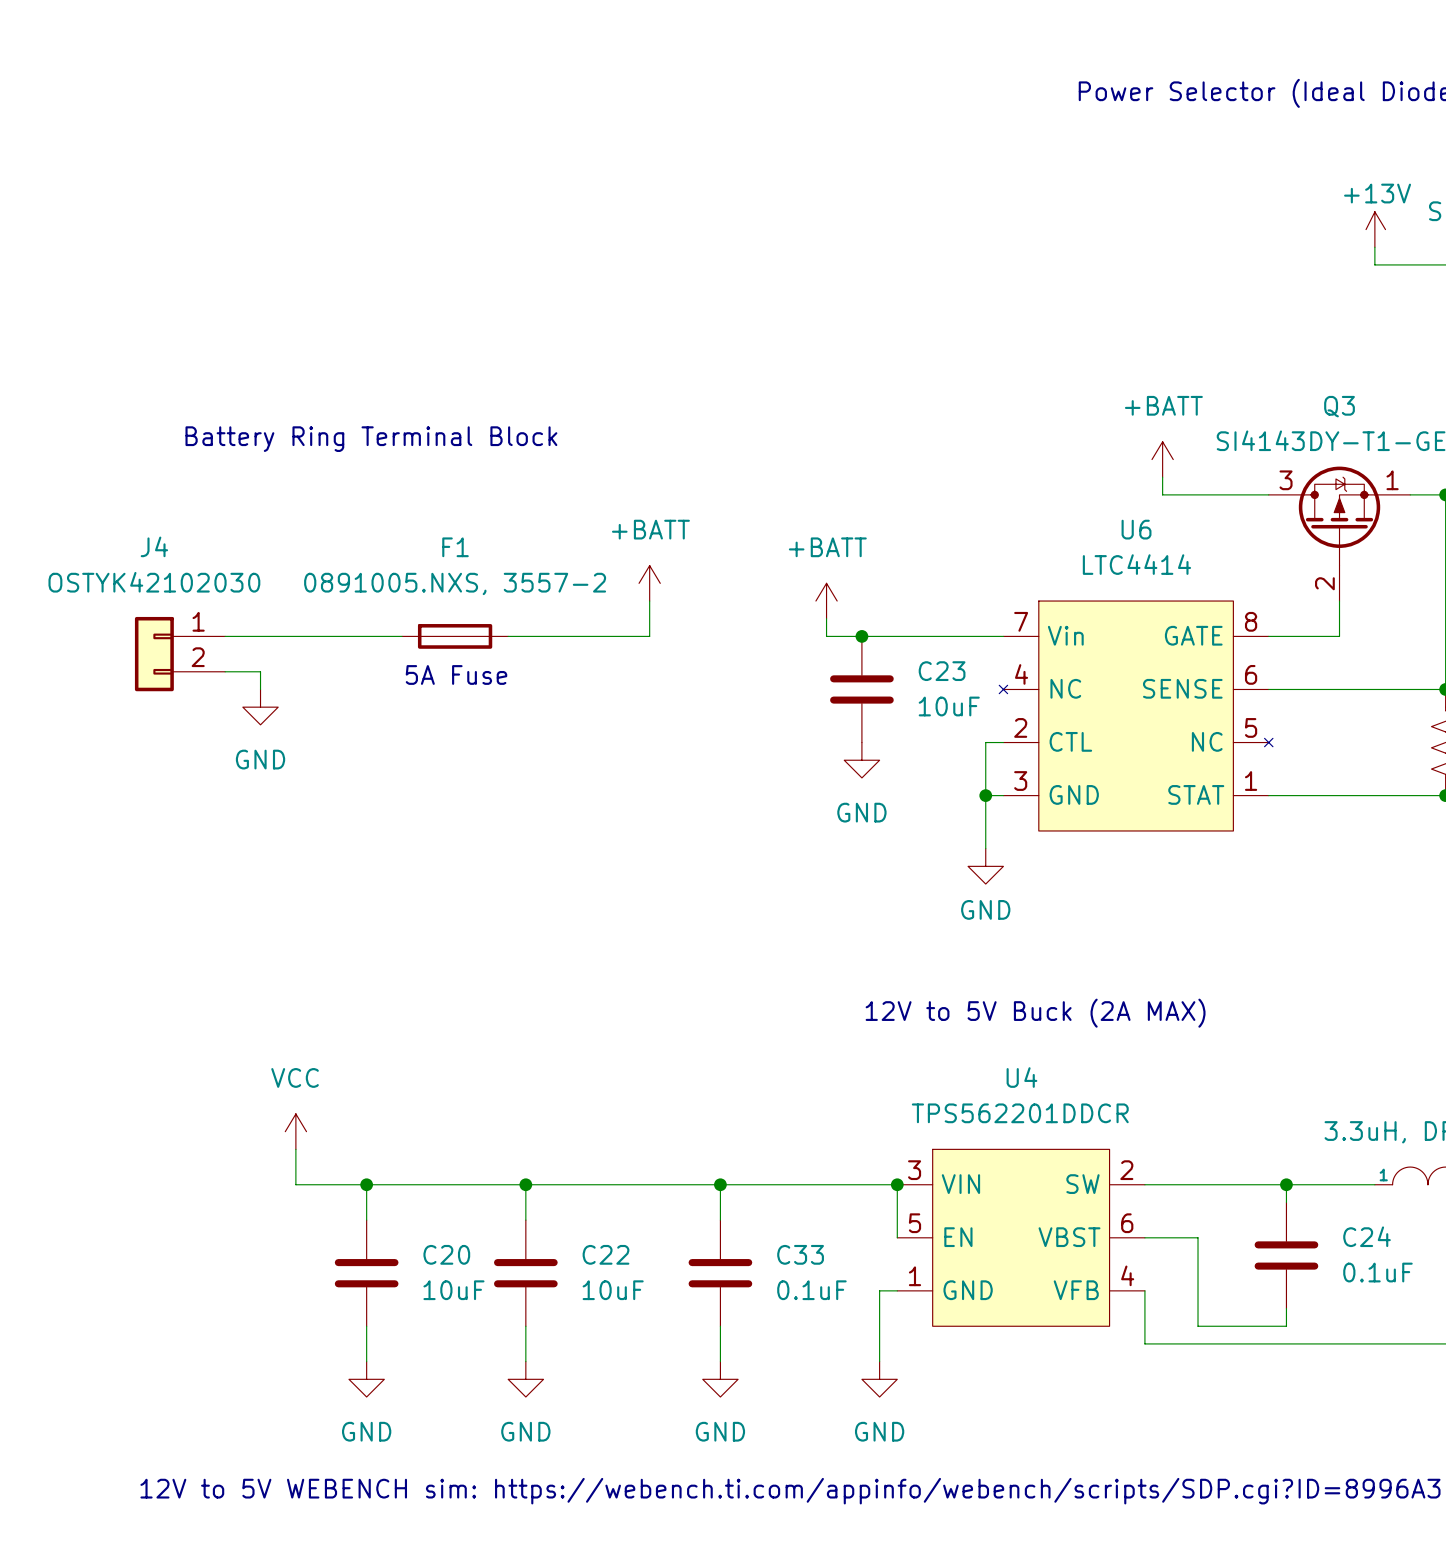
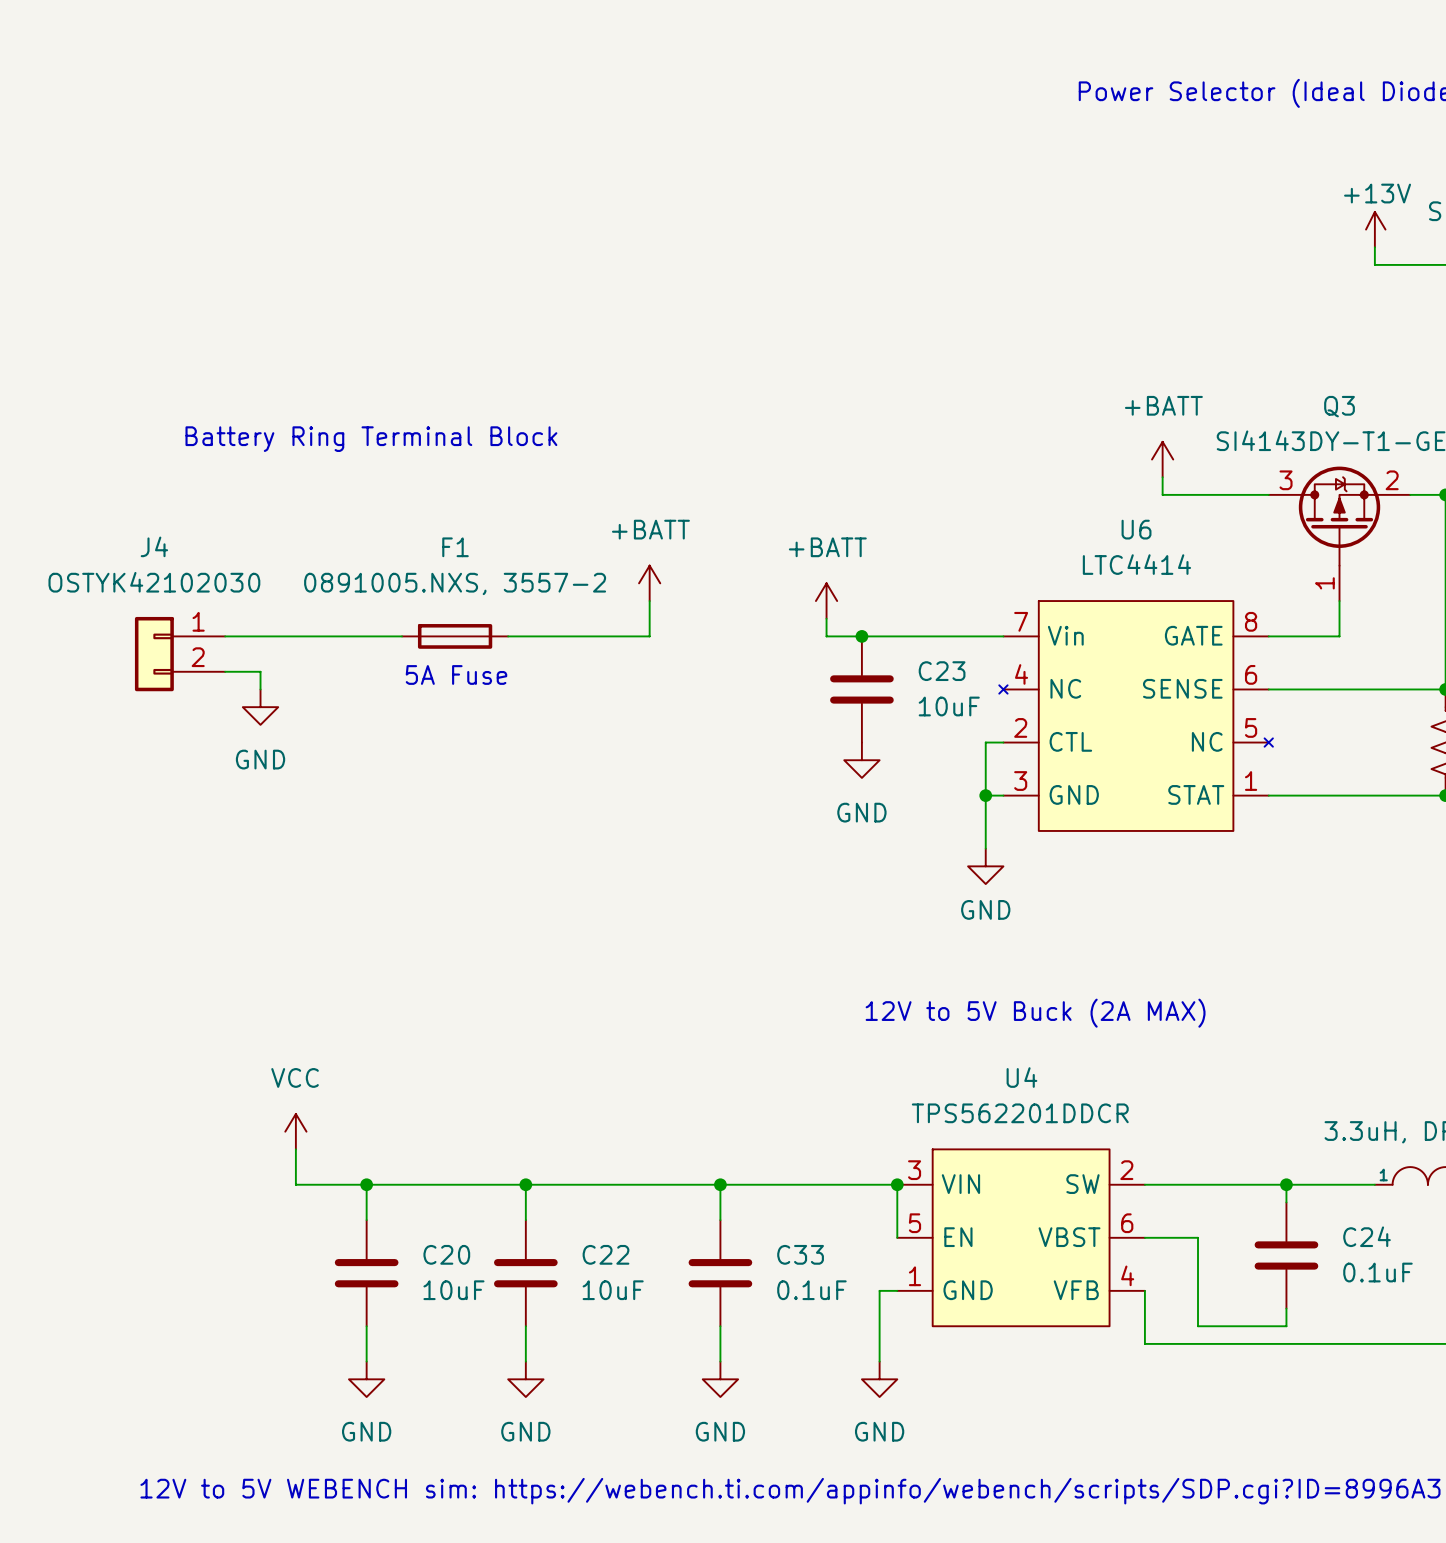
Q3 pin number: 1 (1392, 480) -> 2 (1392, 480)
Q3 pin number: 2 (1324, 583) -> 1 (1324, 583)

